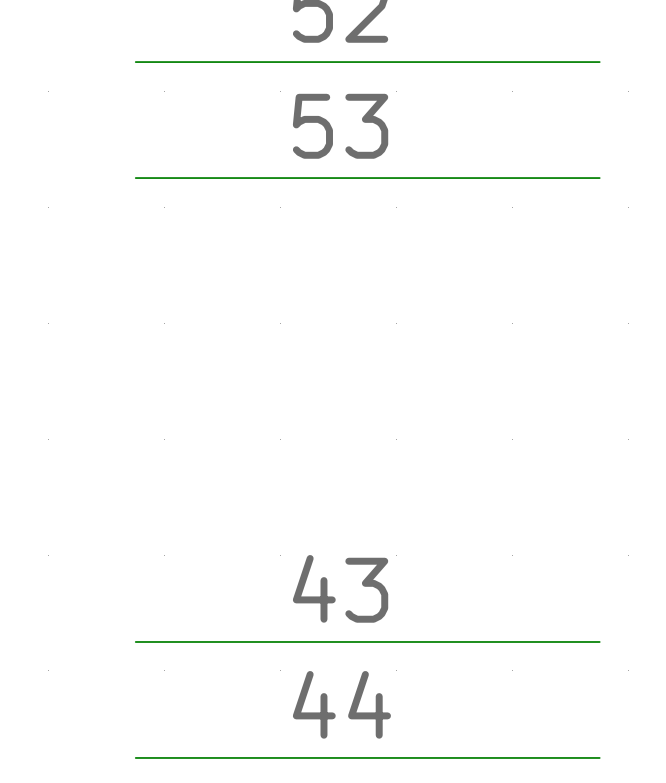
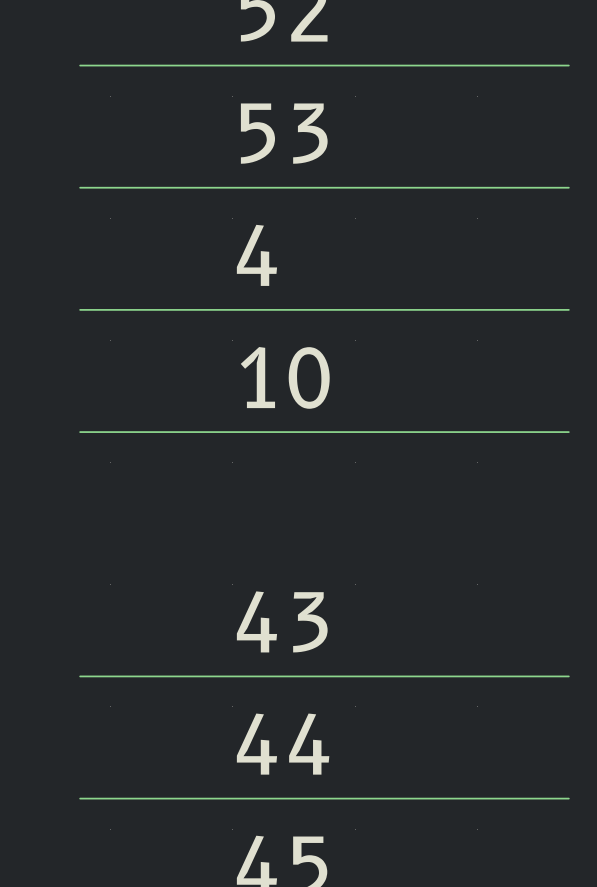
label: none -> 4 (256, 255)
wire: none -> (80, 309) (568, 309)
label: none -> 10 (285, 377)
wire: none -> (80, 432) (568, 432)

